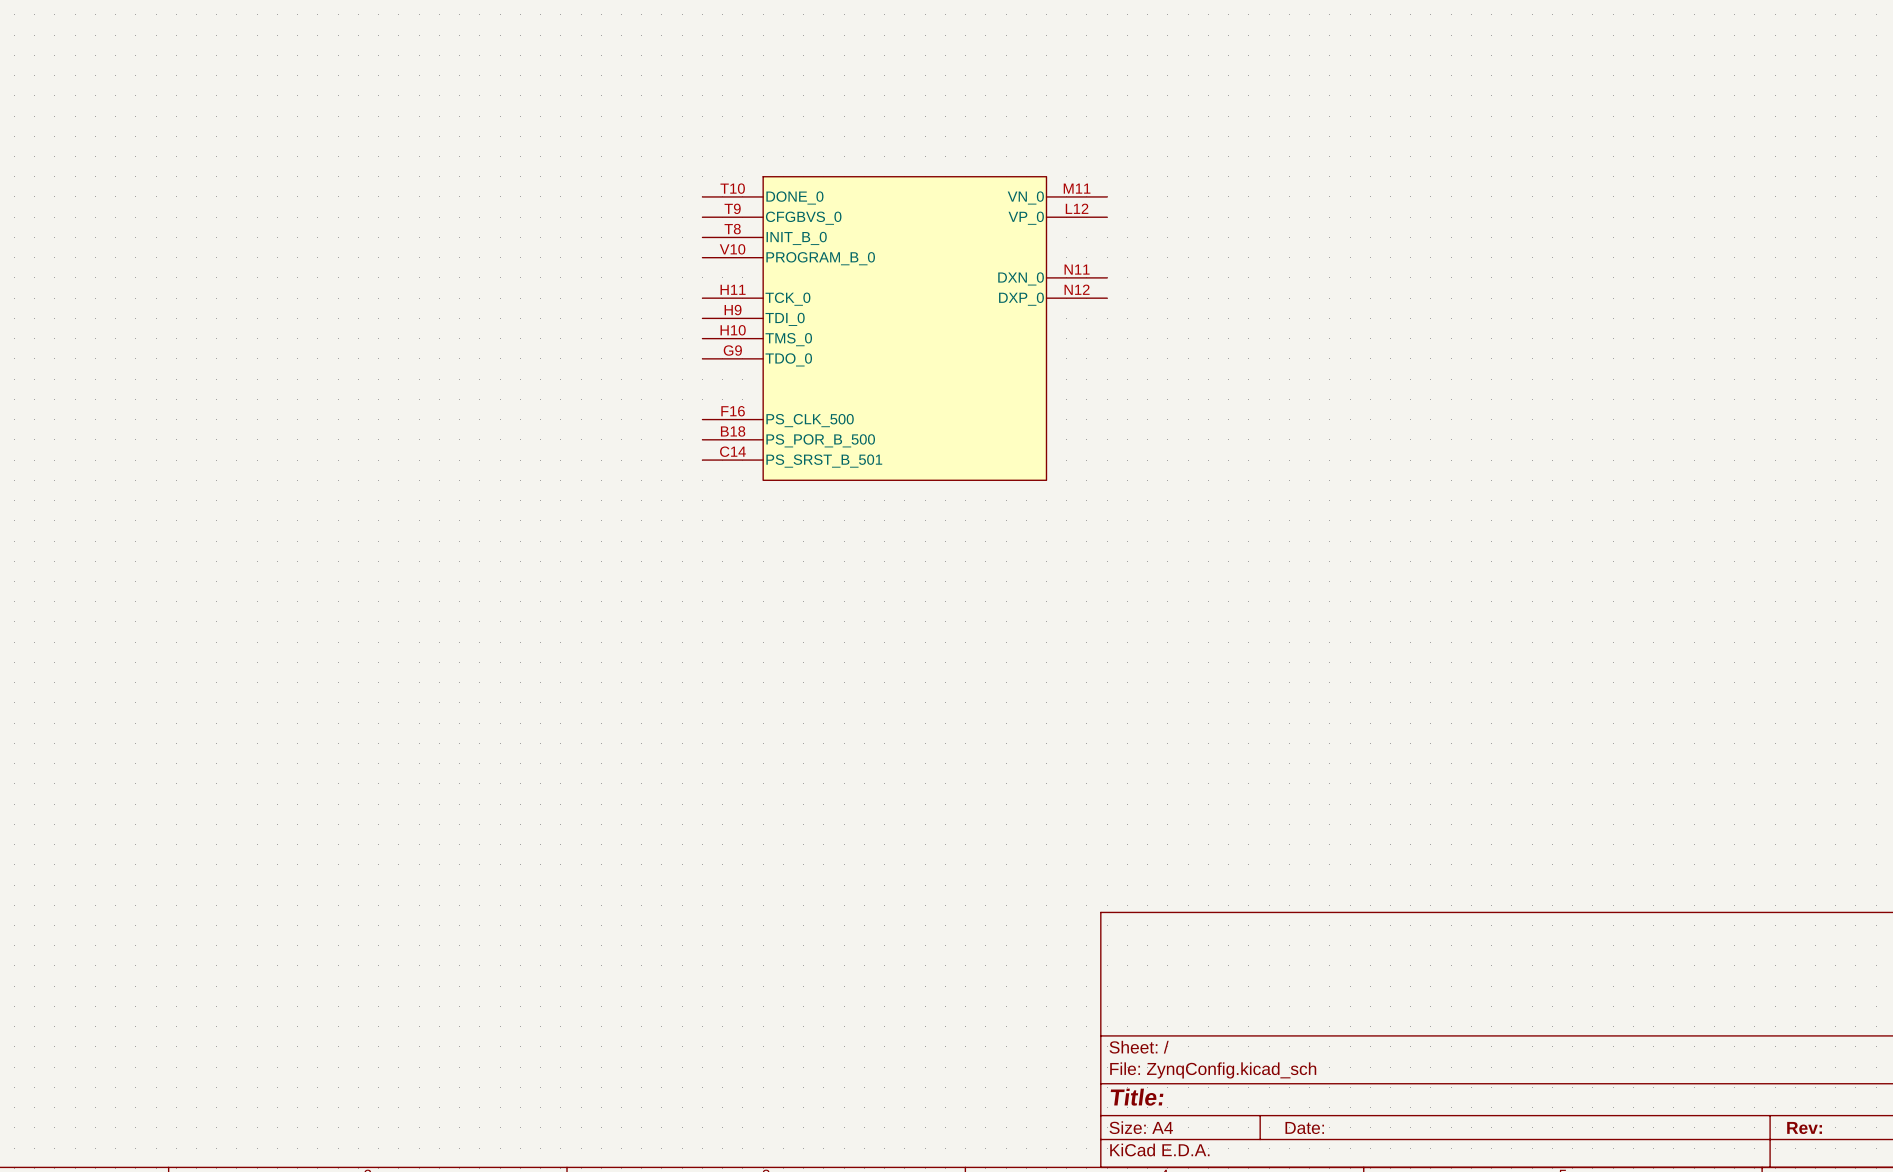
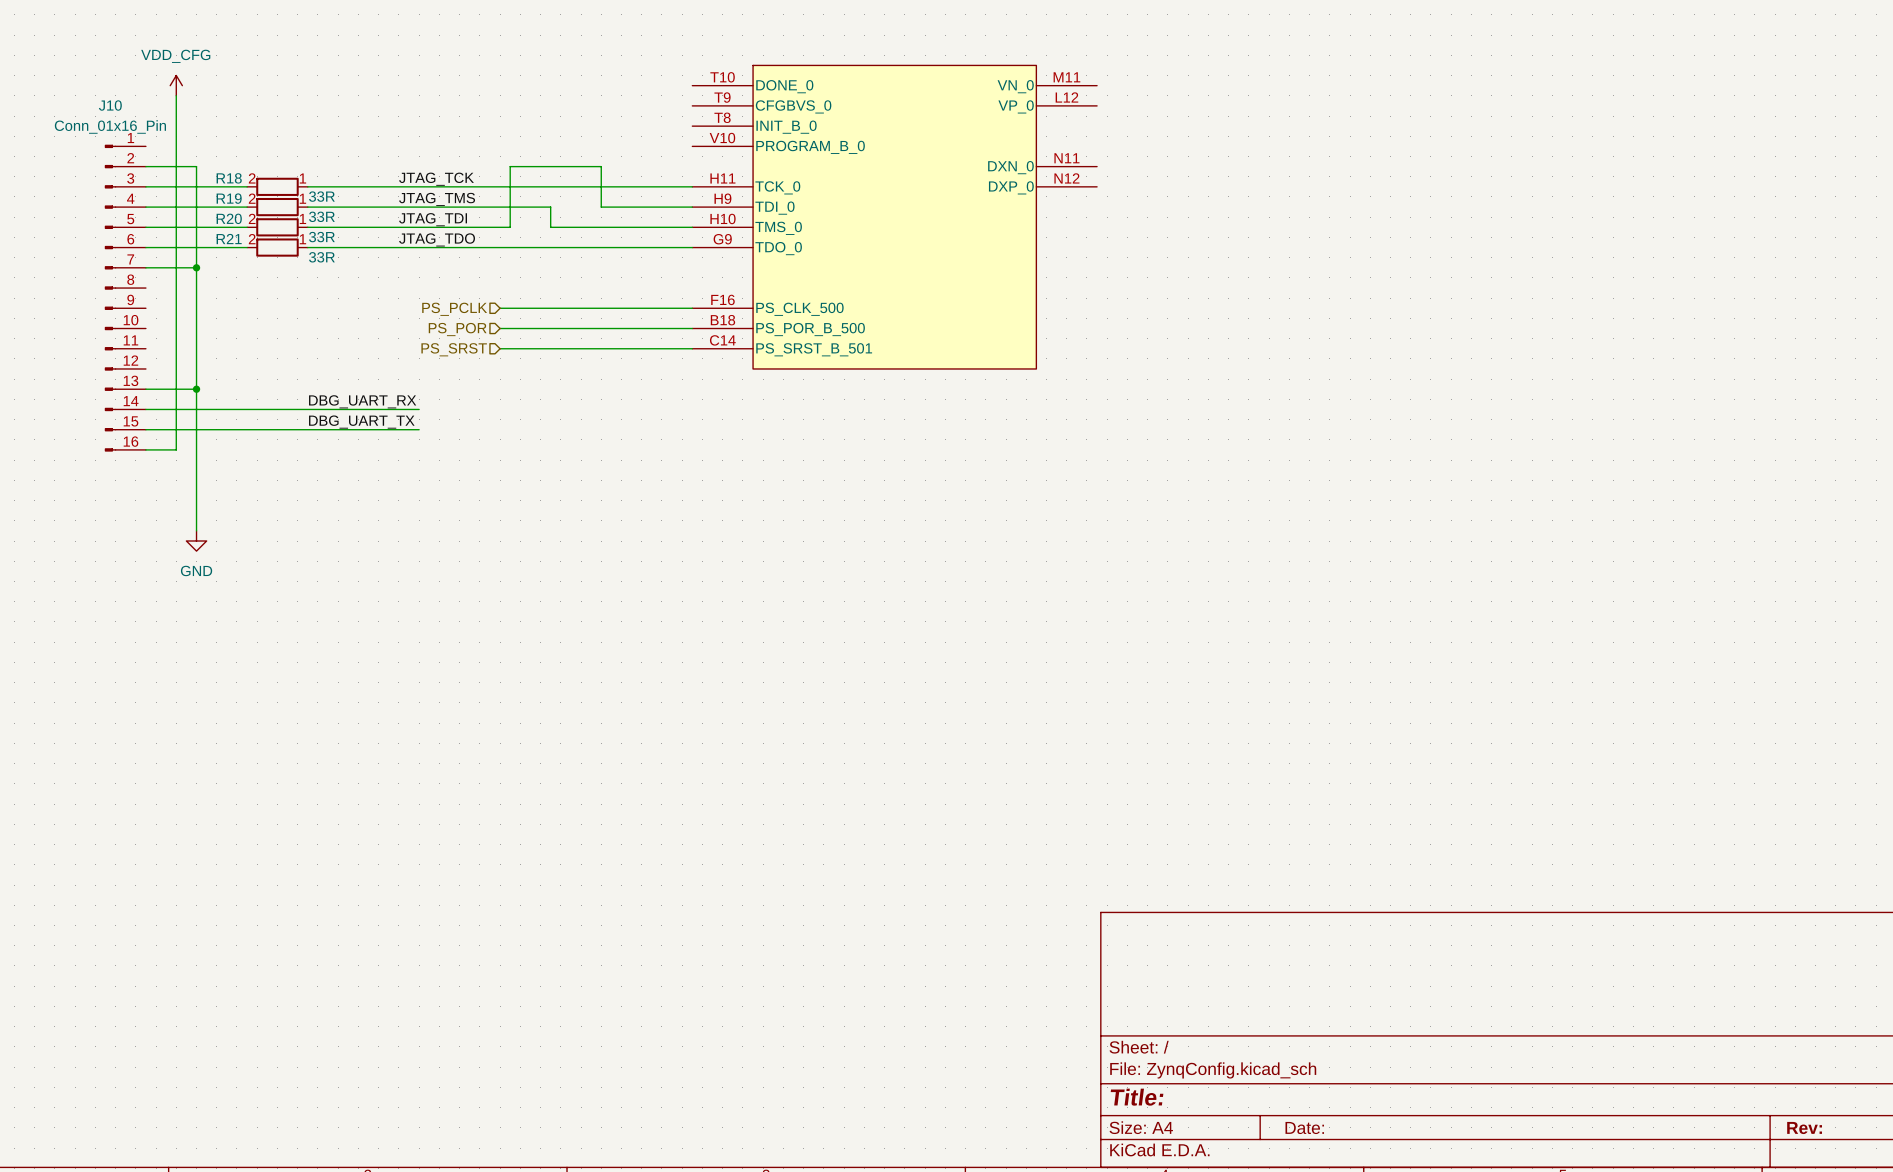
power symbol: none -> VDD_CFG (176, 85)
wire: none -> (176, 95) (176, 449) (145, 449)
wire: none -> (145, 166) (196, 166) (196, 530)
label: none -> JTAG_TCK (436, 179)
wire: none -> (145, 186) (247, 186)
R18: none -> 33R (277, 186)
wire: none -> (307, 186) (692, 186)
label: none -> JTAG_TMS (437, 199)
wire: none -> (145, 207) (247, 207)
R19: none -> 33R (277, 207)
wire: none -> (307, 207) (550, 207) (550, 227) (692, 227)
wire: none -> (692, 207) (601, 207) (601, 166) (510, 166) (510, 227) (307, 227)
label: none -> JTAG_TDI (433, 219)
wire: none -> (145, 227) (247, 227)
R20: none -> 33R (277, 227)
label: none -> JTAG_TDO (437, 239)
wire: none -> (145, 247) (247, 247)
R21: none -> 33R (277, 247)
wire: none -> (307, 247) (692, 247)
wire: none -> (145, 267) (196, 267)
junction: none -> (196, 267)
J10: none -> Conn_01x16_Pin (125, 298)
wire: none -> (500, 308) (692, 308)
hierarchical label: none -> PS_PCLK (454, 309)
wire: none -> (500, 328) (692, 328)
part position: (904, 328) -> (894, 217)
hierarchical label: none -> PS_POR (457, 329)
wire: none -> (500, 348) (692, 348)
hierarchical label: none -> PS_SRST (454, 349)
wire: none -> (145, 389) (196, 389)
junction: none -> (196, 389)
label: none -> DBG_UART_RX (362, 401)
wire: none -> (145, 409) (419, 409)
label: none -> DBG_UART_TX (361, 422)
wire: none -> (145, 429) (419, 429)
power symbol: none -> GND (196, 541)

